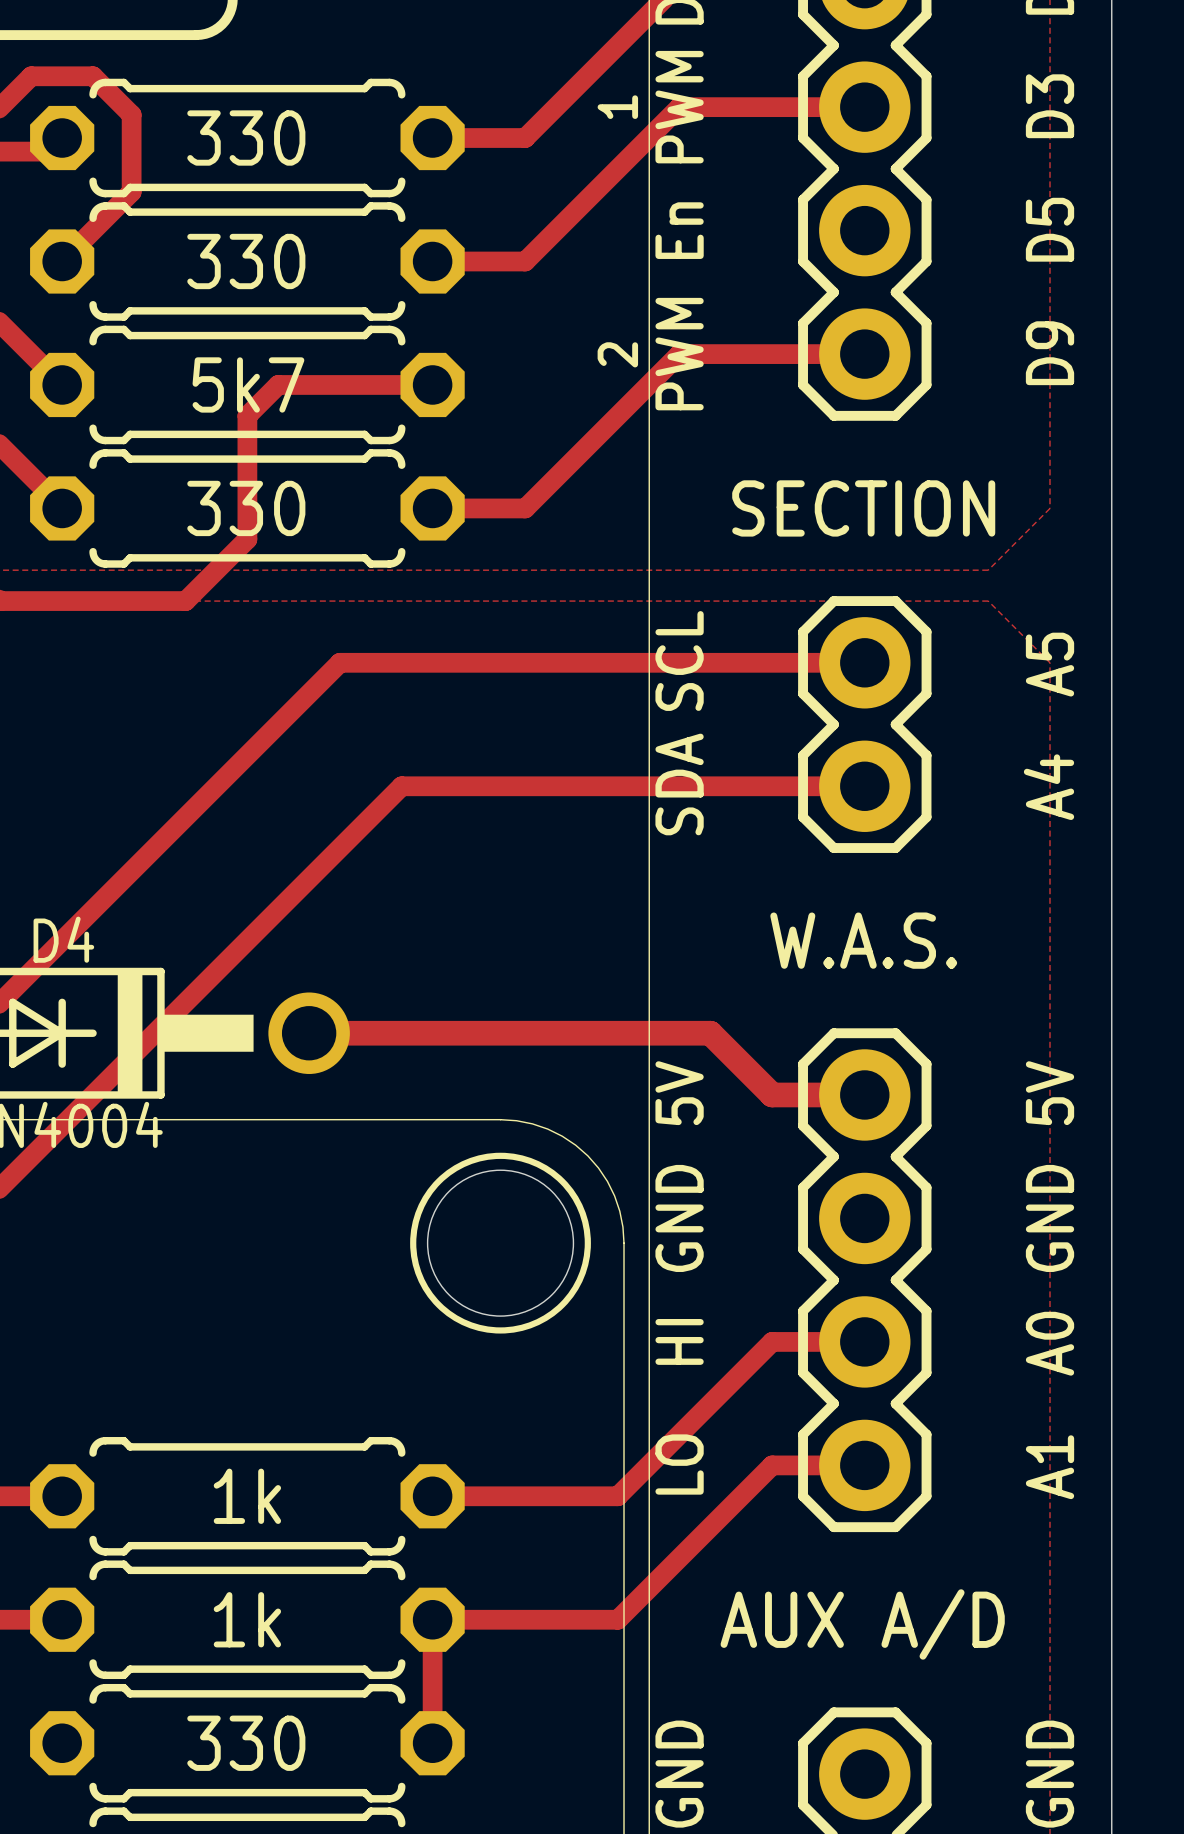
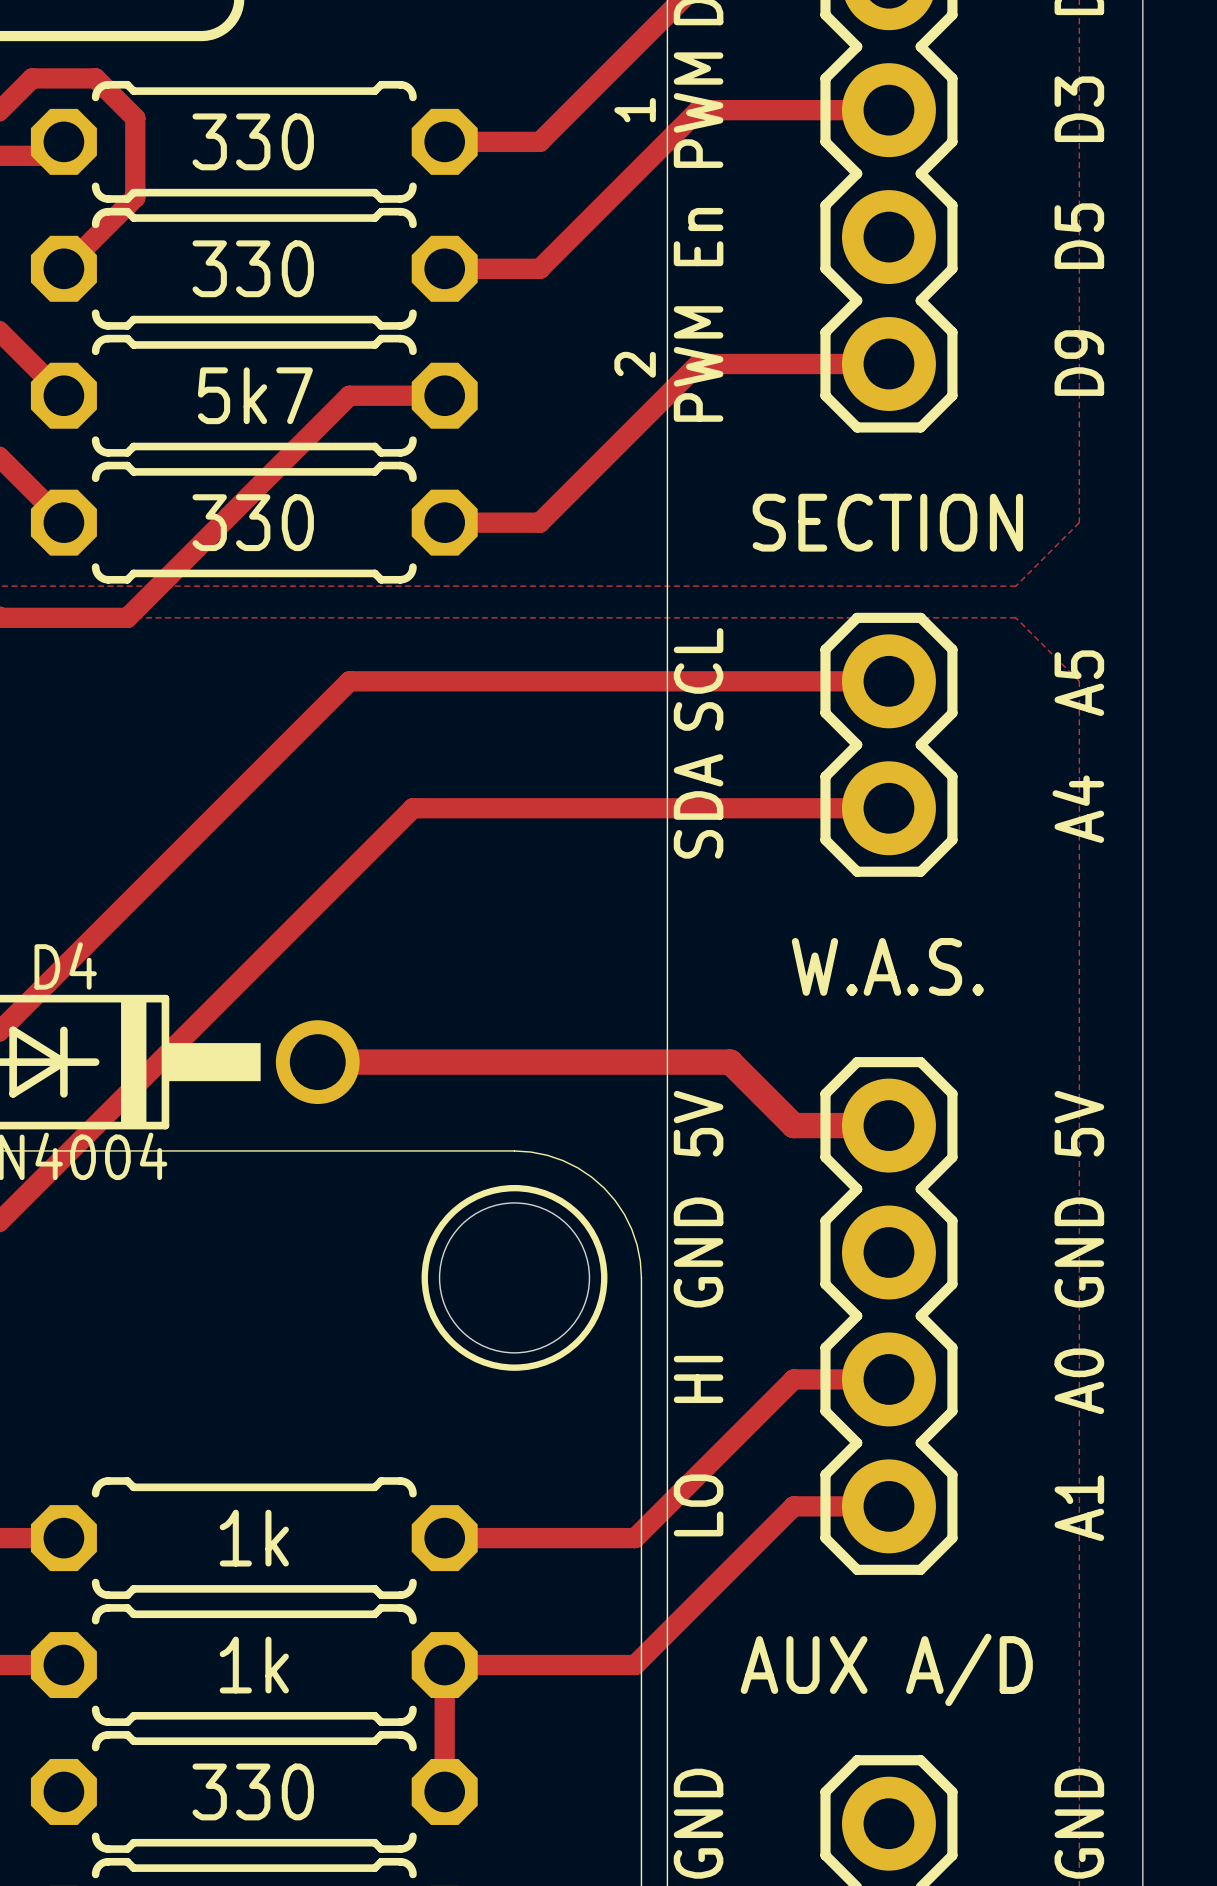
track: (340, 384) (278, 384) (247, 415) (247, 539) (185, 601) (123, 601) -> (349, 395) (127, 617)

